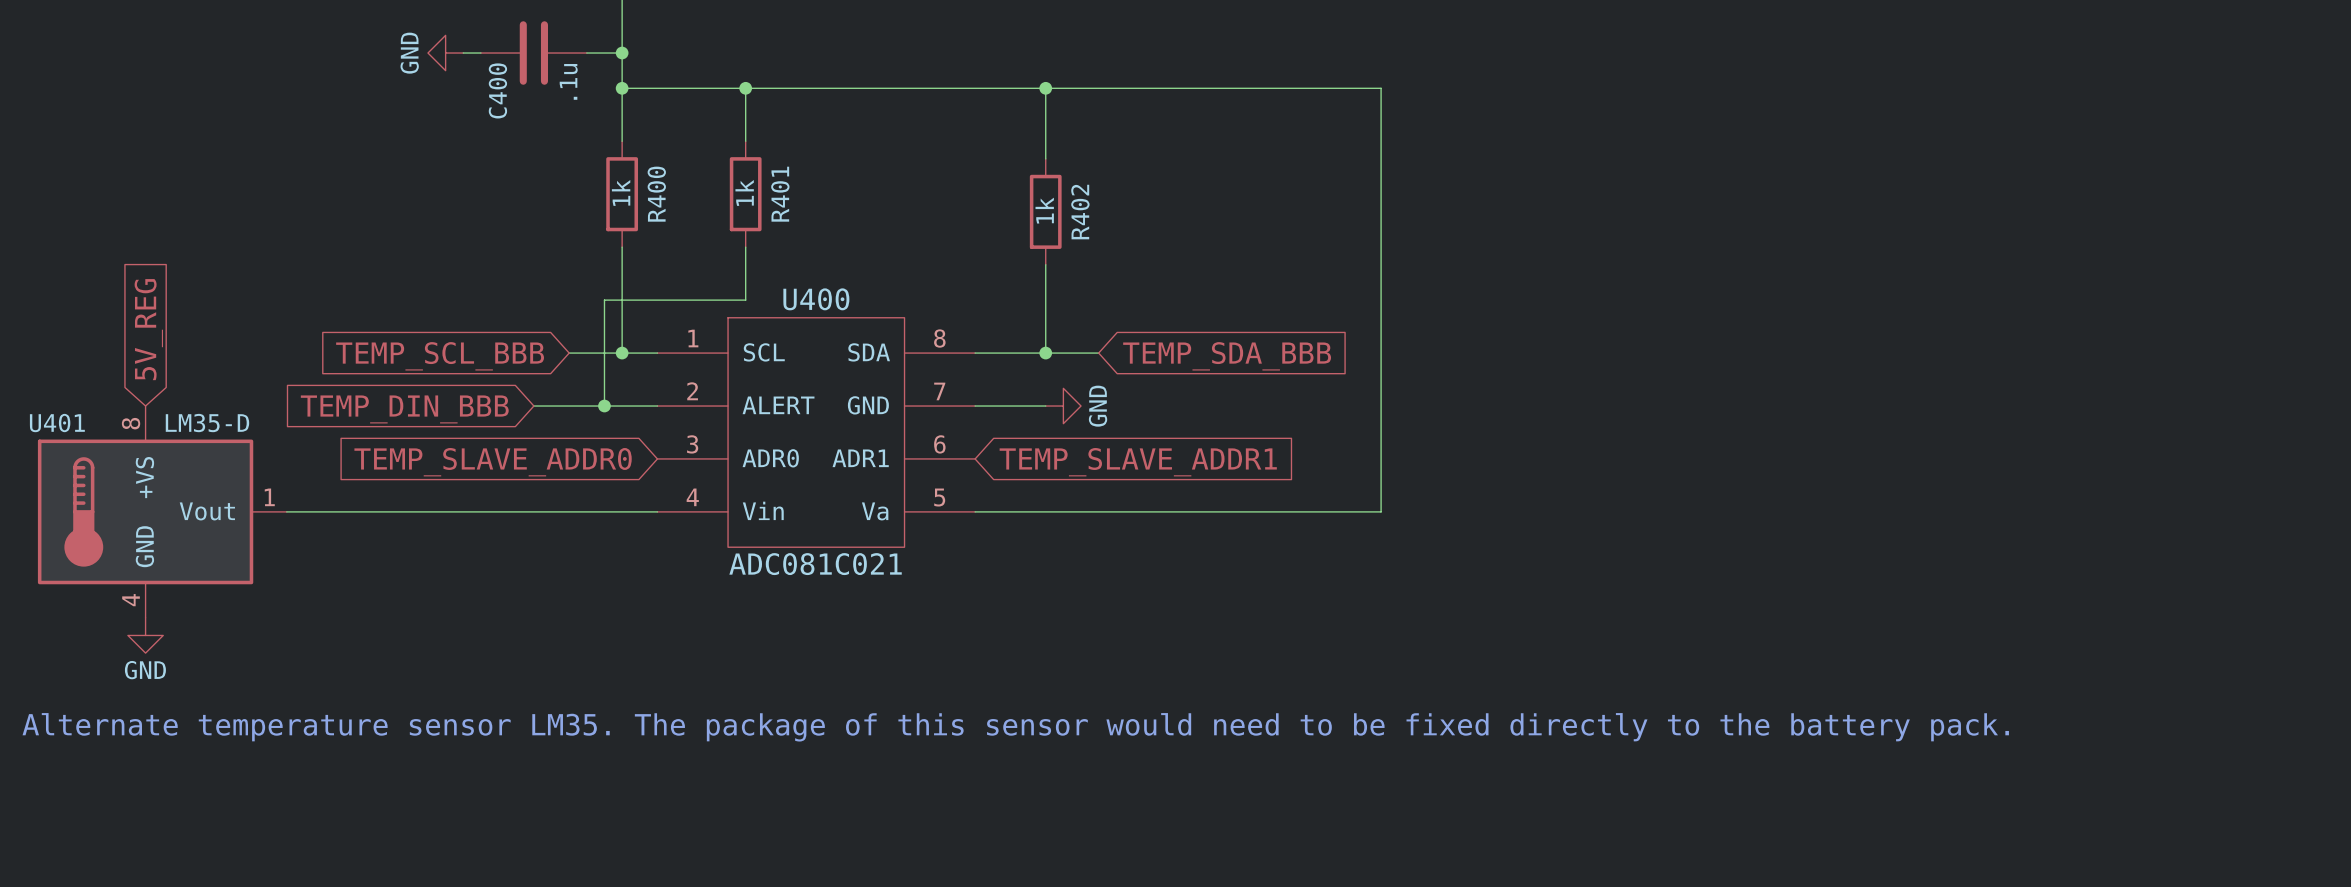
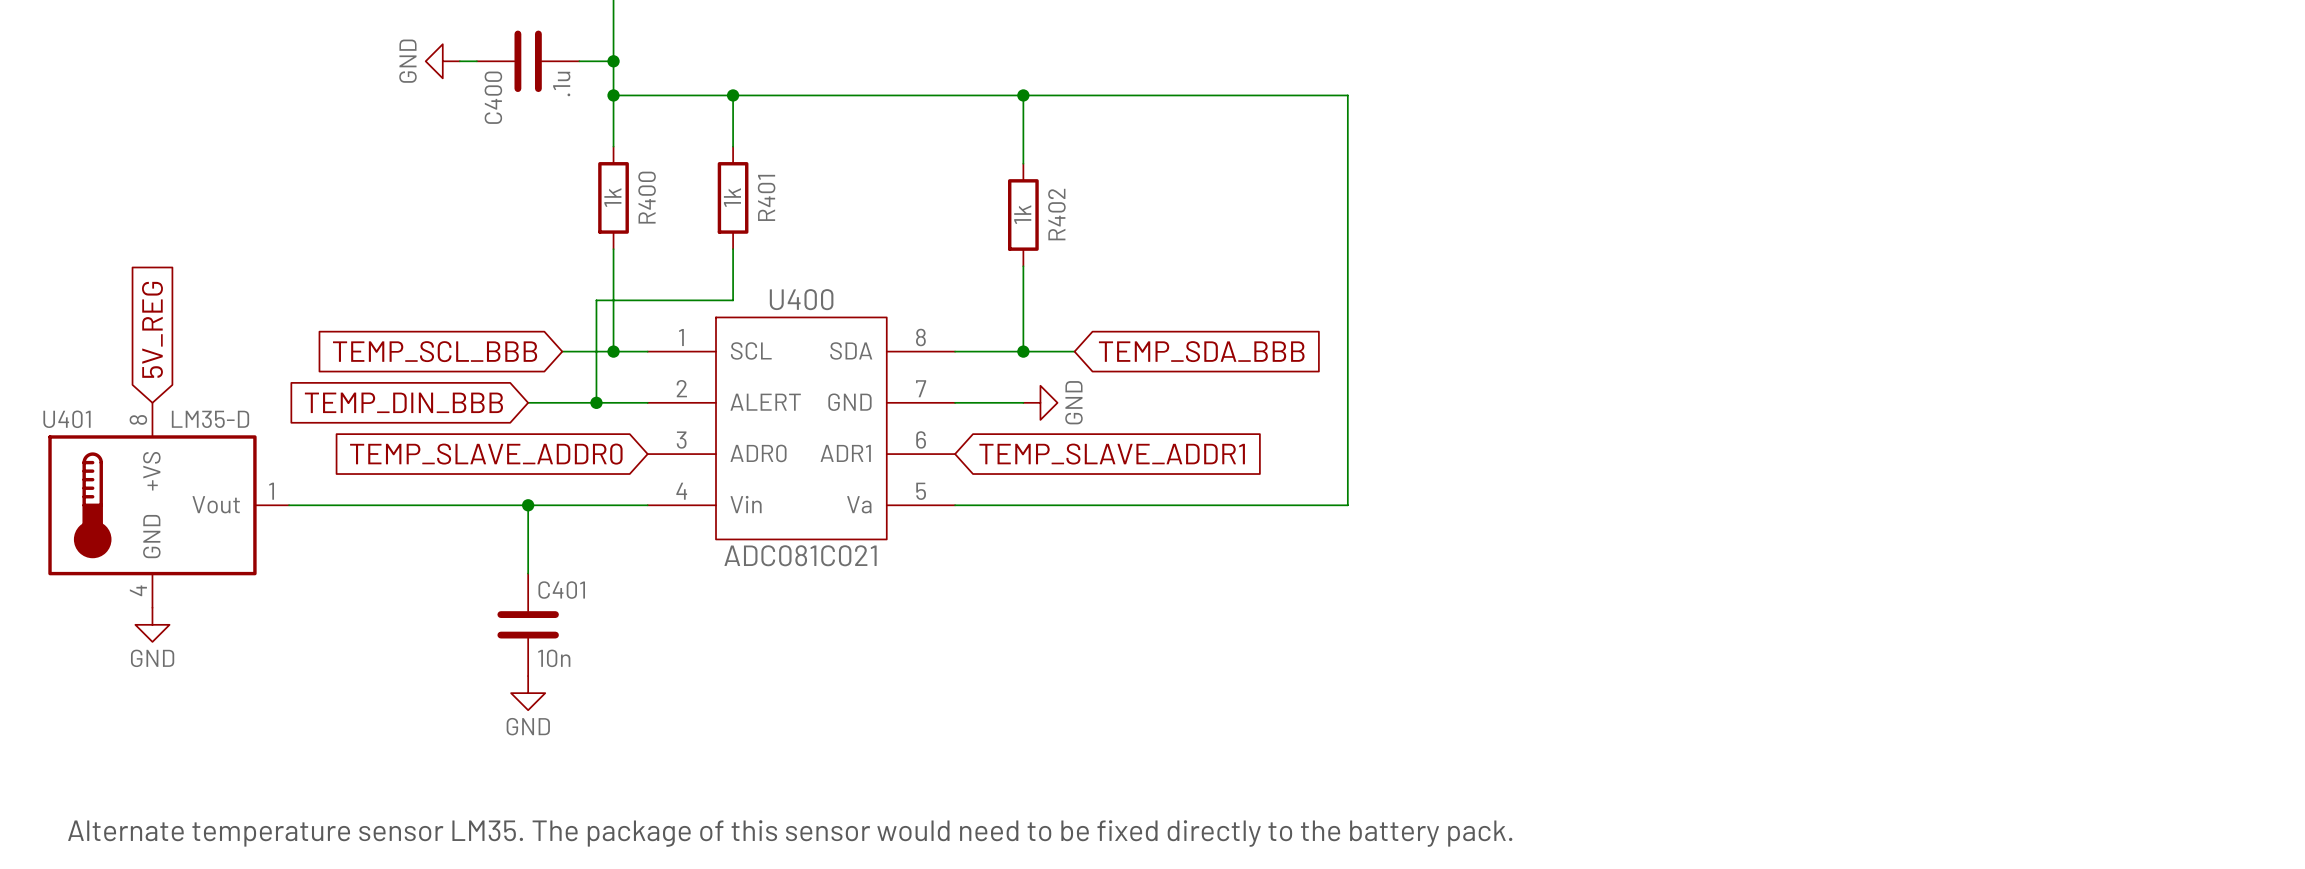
wire: none -> (528, 505) (528, 573)
junction: none -> (528, 505)
C401: none -> 10n (528, 624)
power symbol: none -> GND (528, 693)
text position: Alternate temperature sensor LM35. The package of this sensor would need to be fixed directly to the battery pack. (1015, 727) -> Alternate temperature sensor LM35. The package of this sensor would need to be fixed directly to the battery pack. (790, 833)

